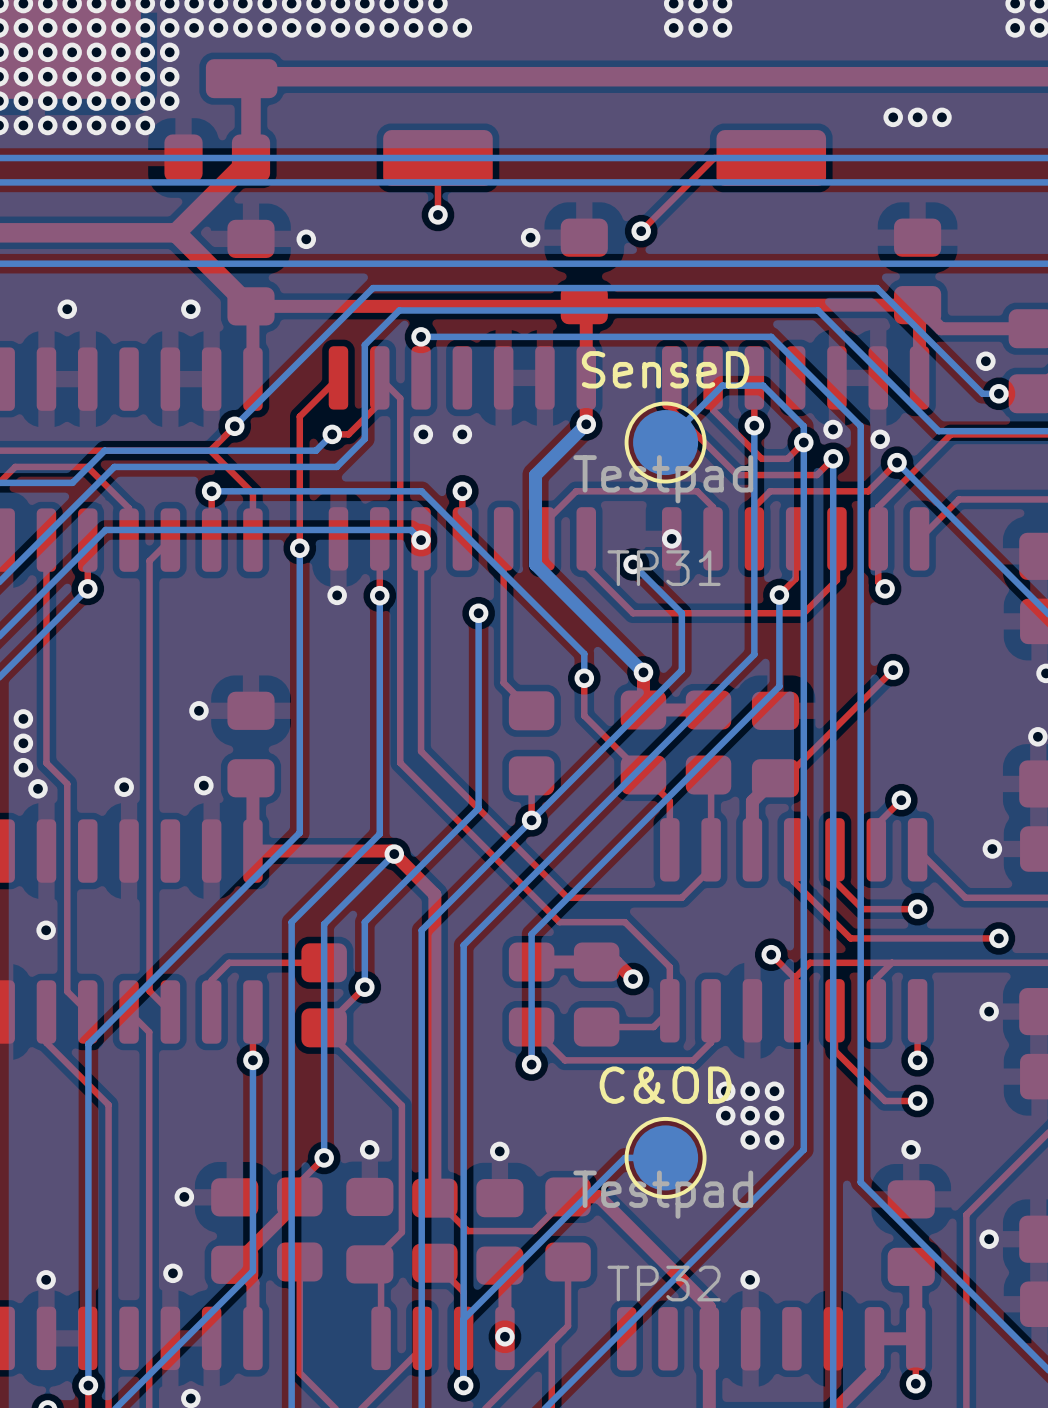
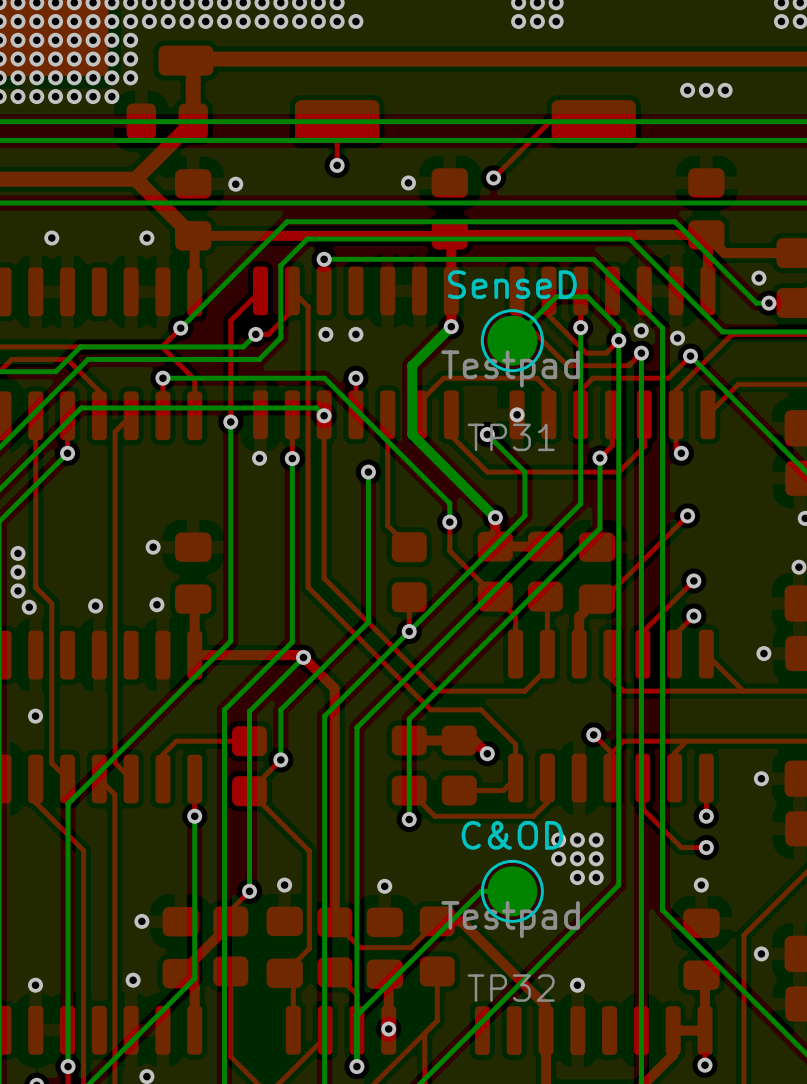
via: none -> (693, 580)
top track: (835, 849) (835, 881) (862, 909) (917, 909) -> (642, 654) (642, 632) (693, 580)
top track: (809, 897) (850, 938) (998, 938) -> (623, 691) (743, 691)
via: (917, 909) -> none
via: (998, 938) -> none

